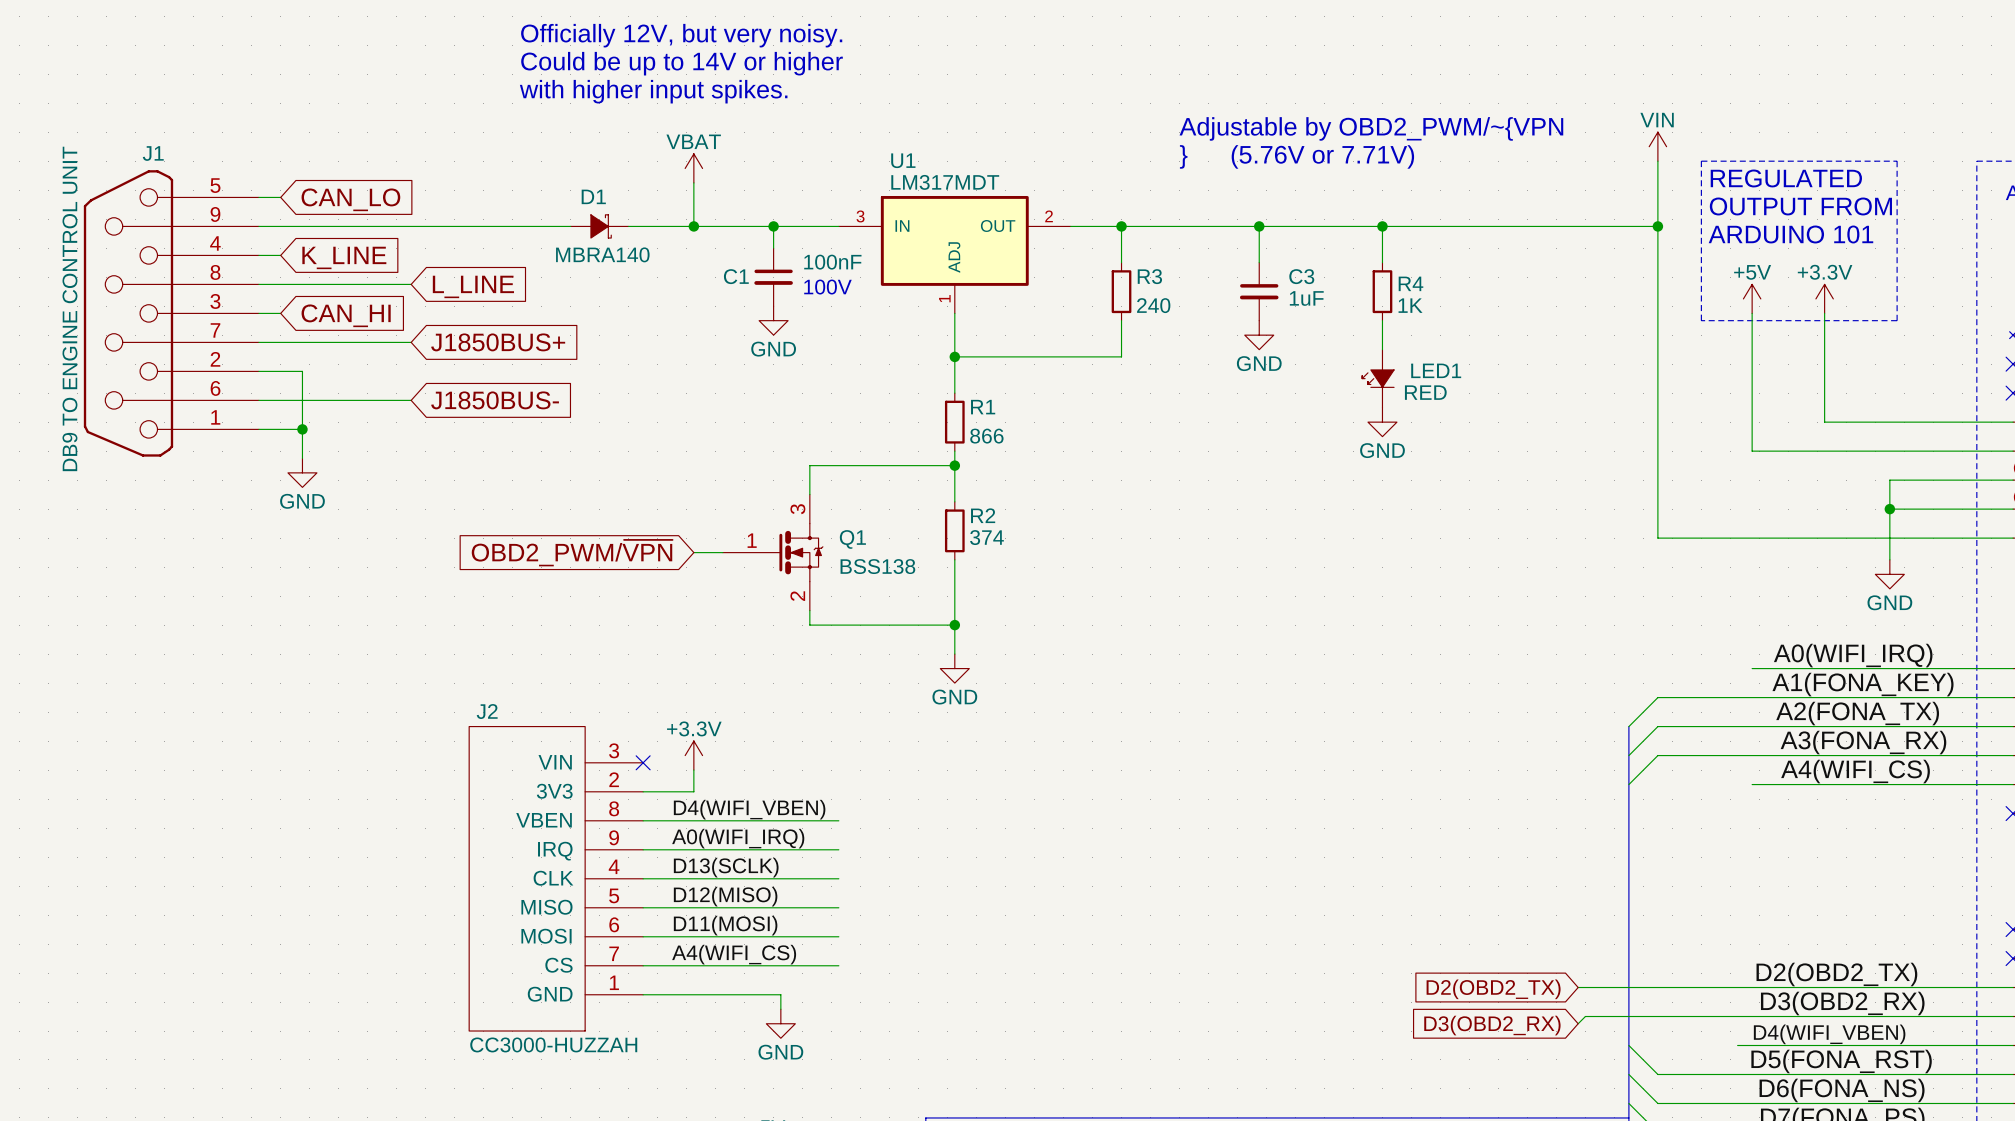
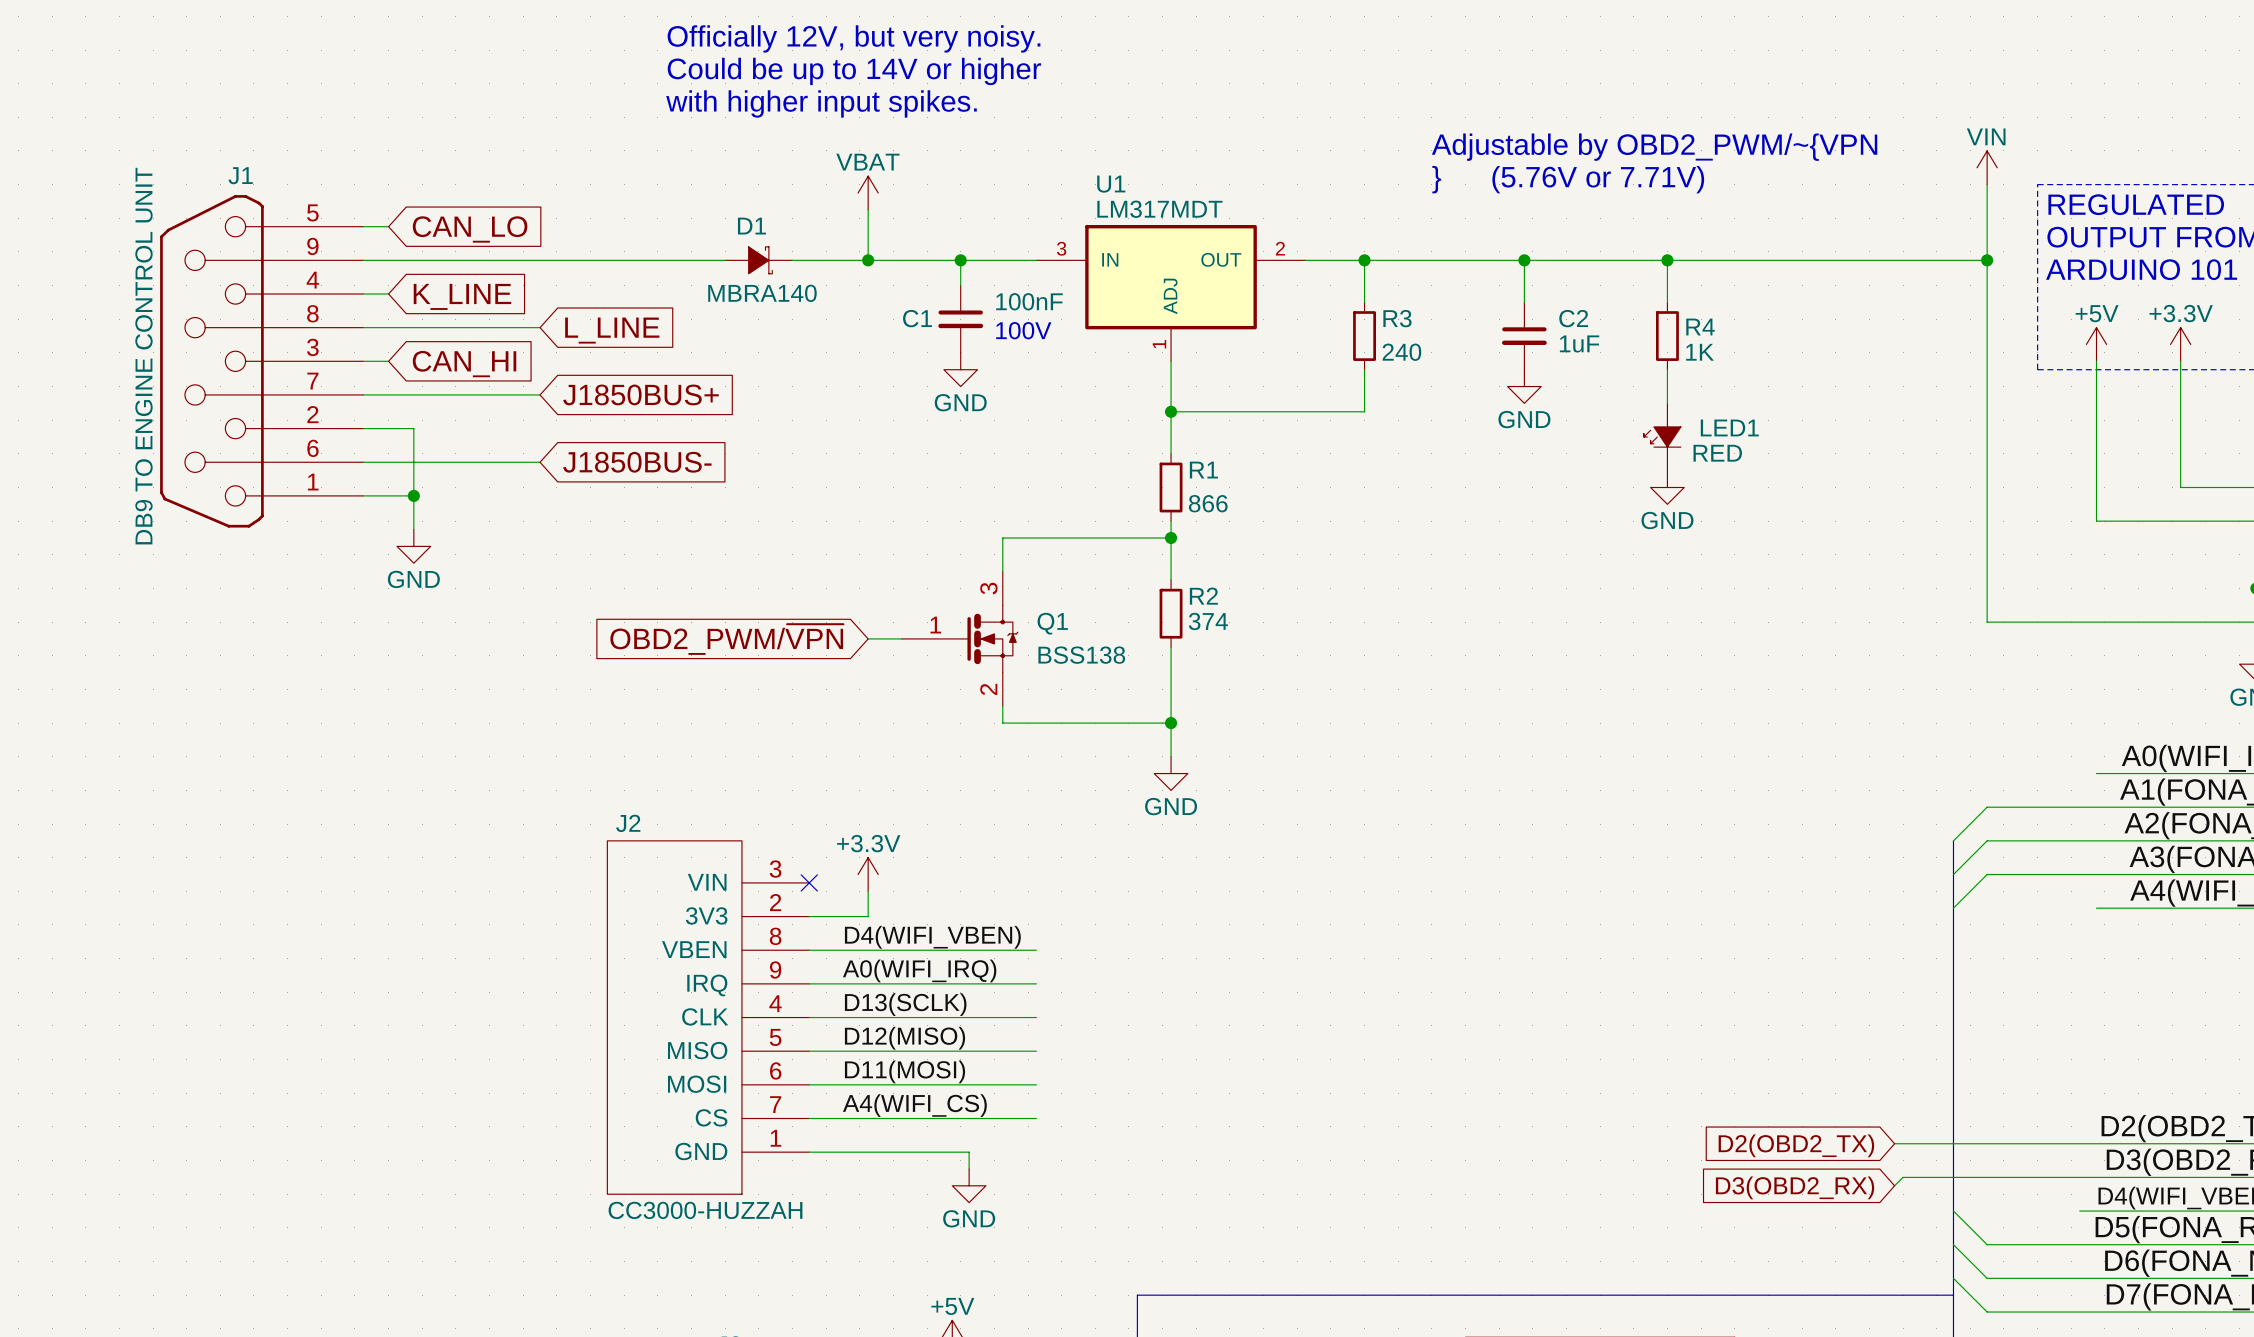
C3 name: C3 (1301, 276) -> C2 (1573, 318)

